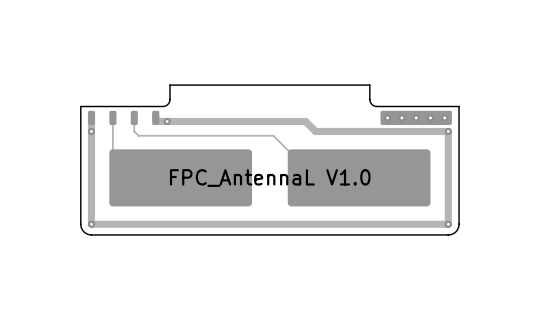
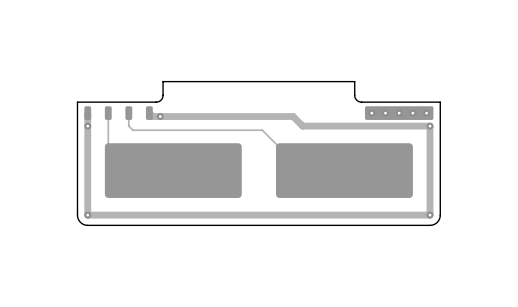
text: FPC_AntennaL V1.0 (270, 178) -> none

